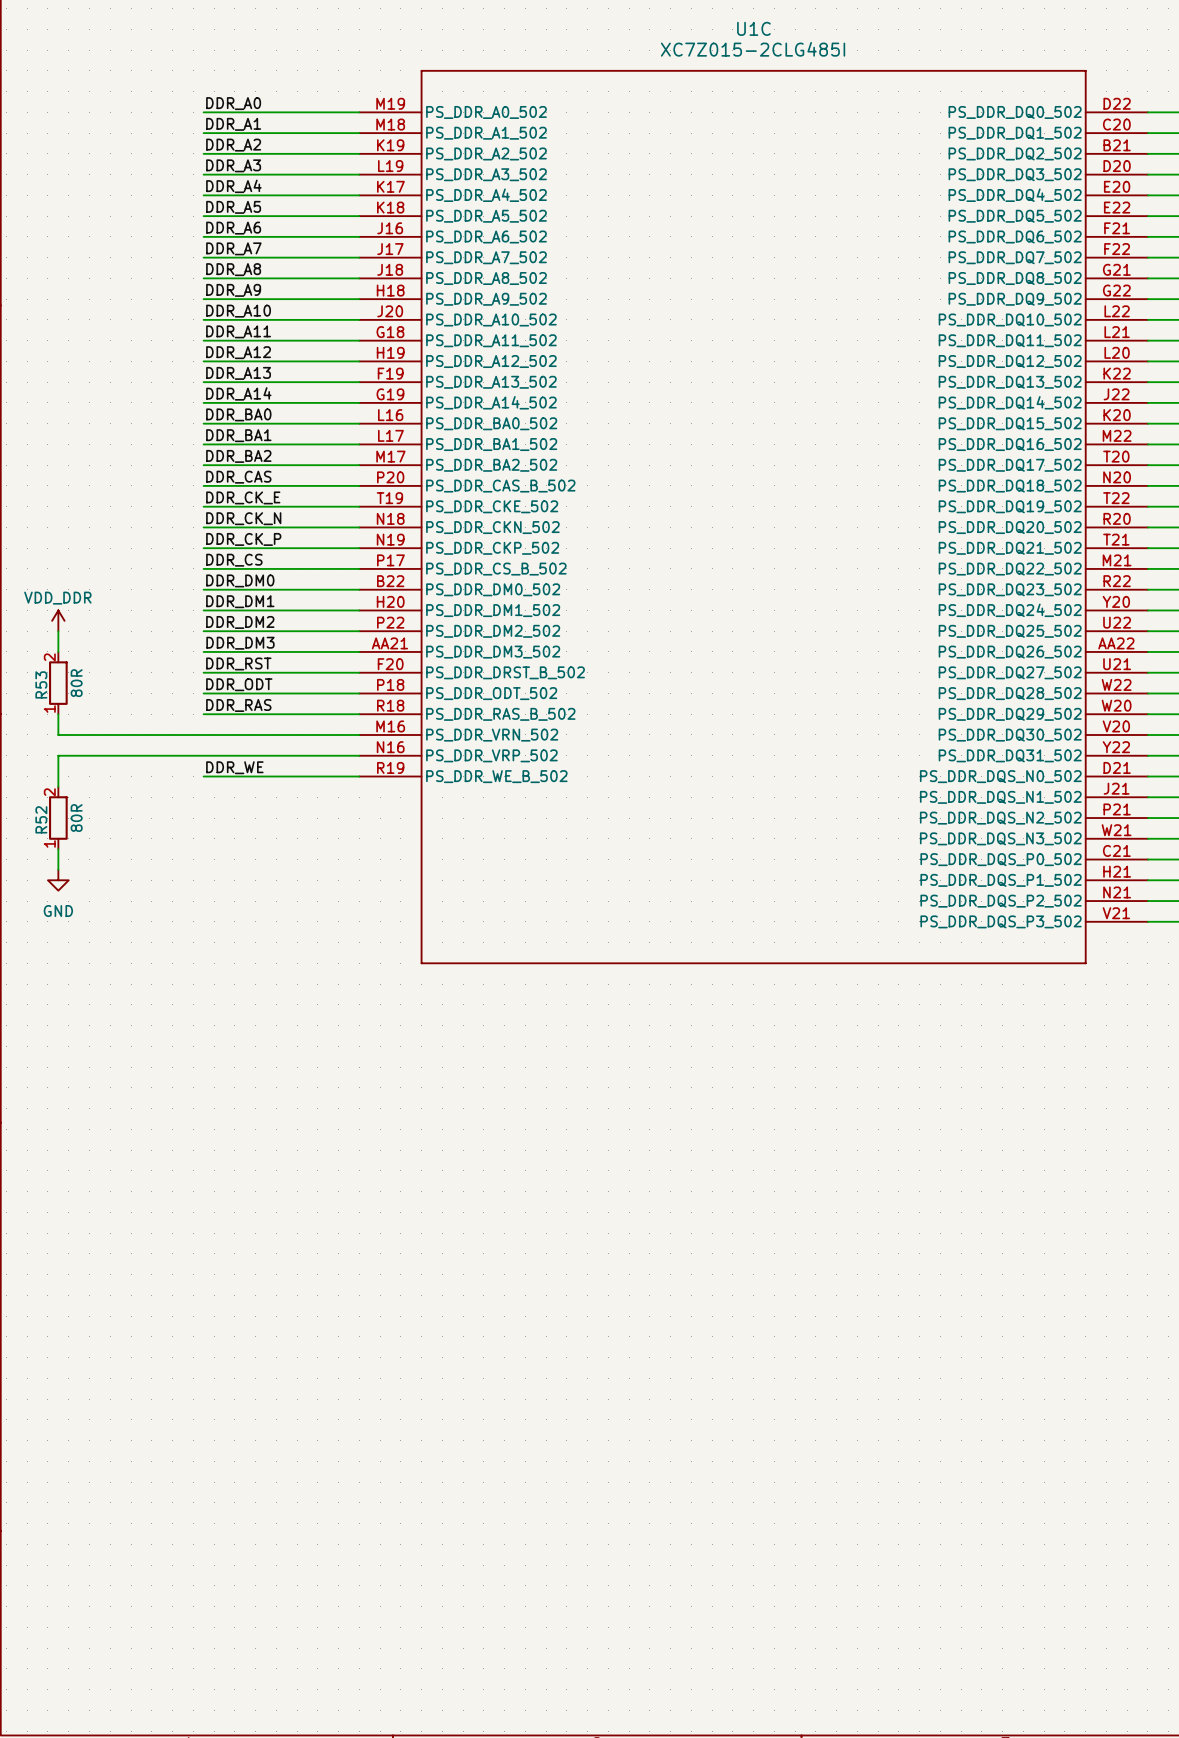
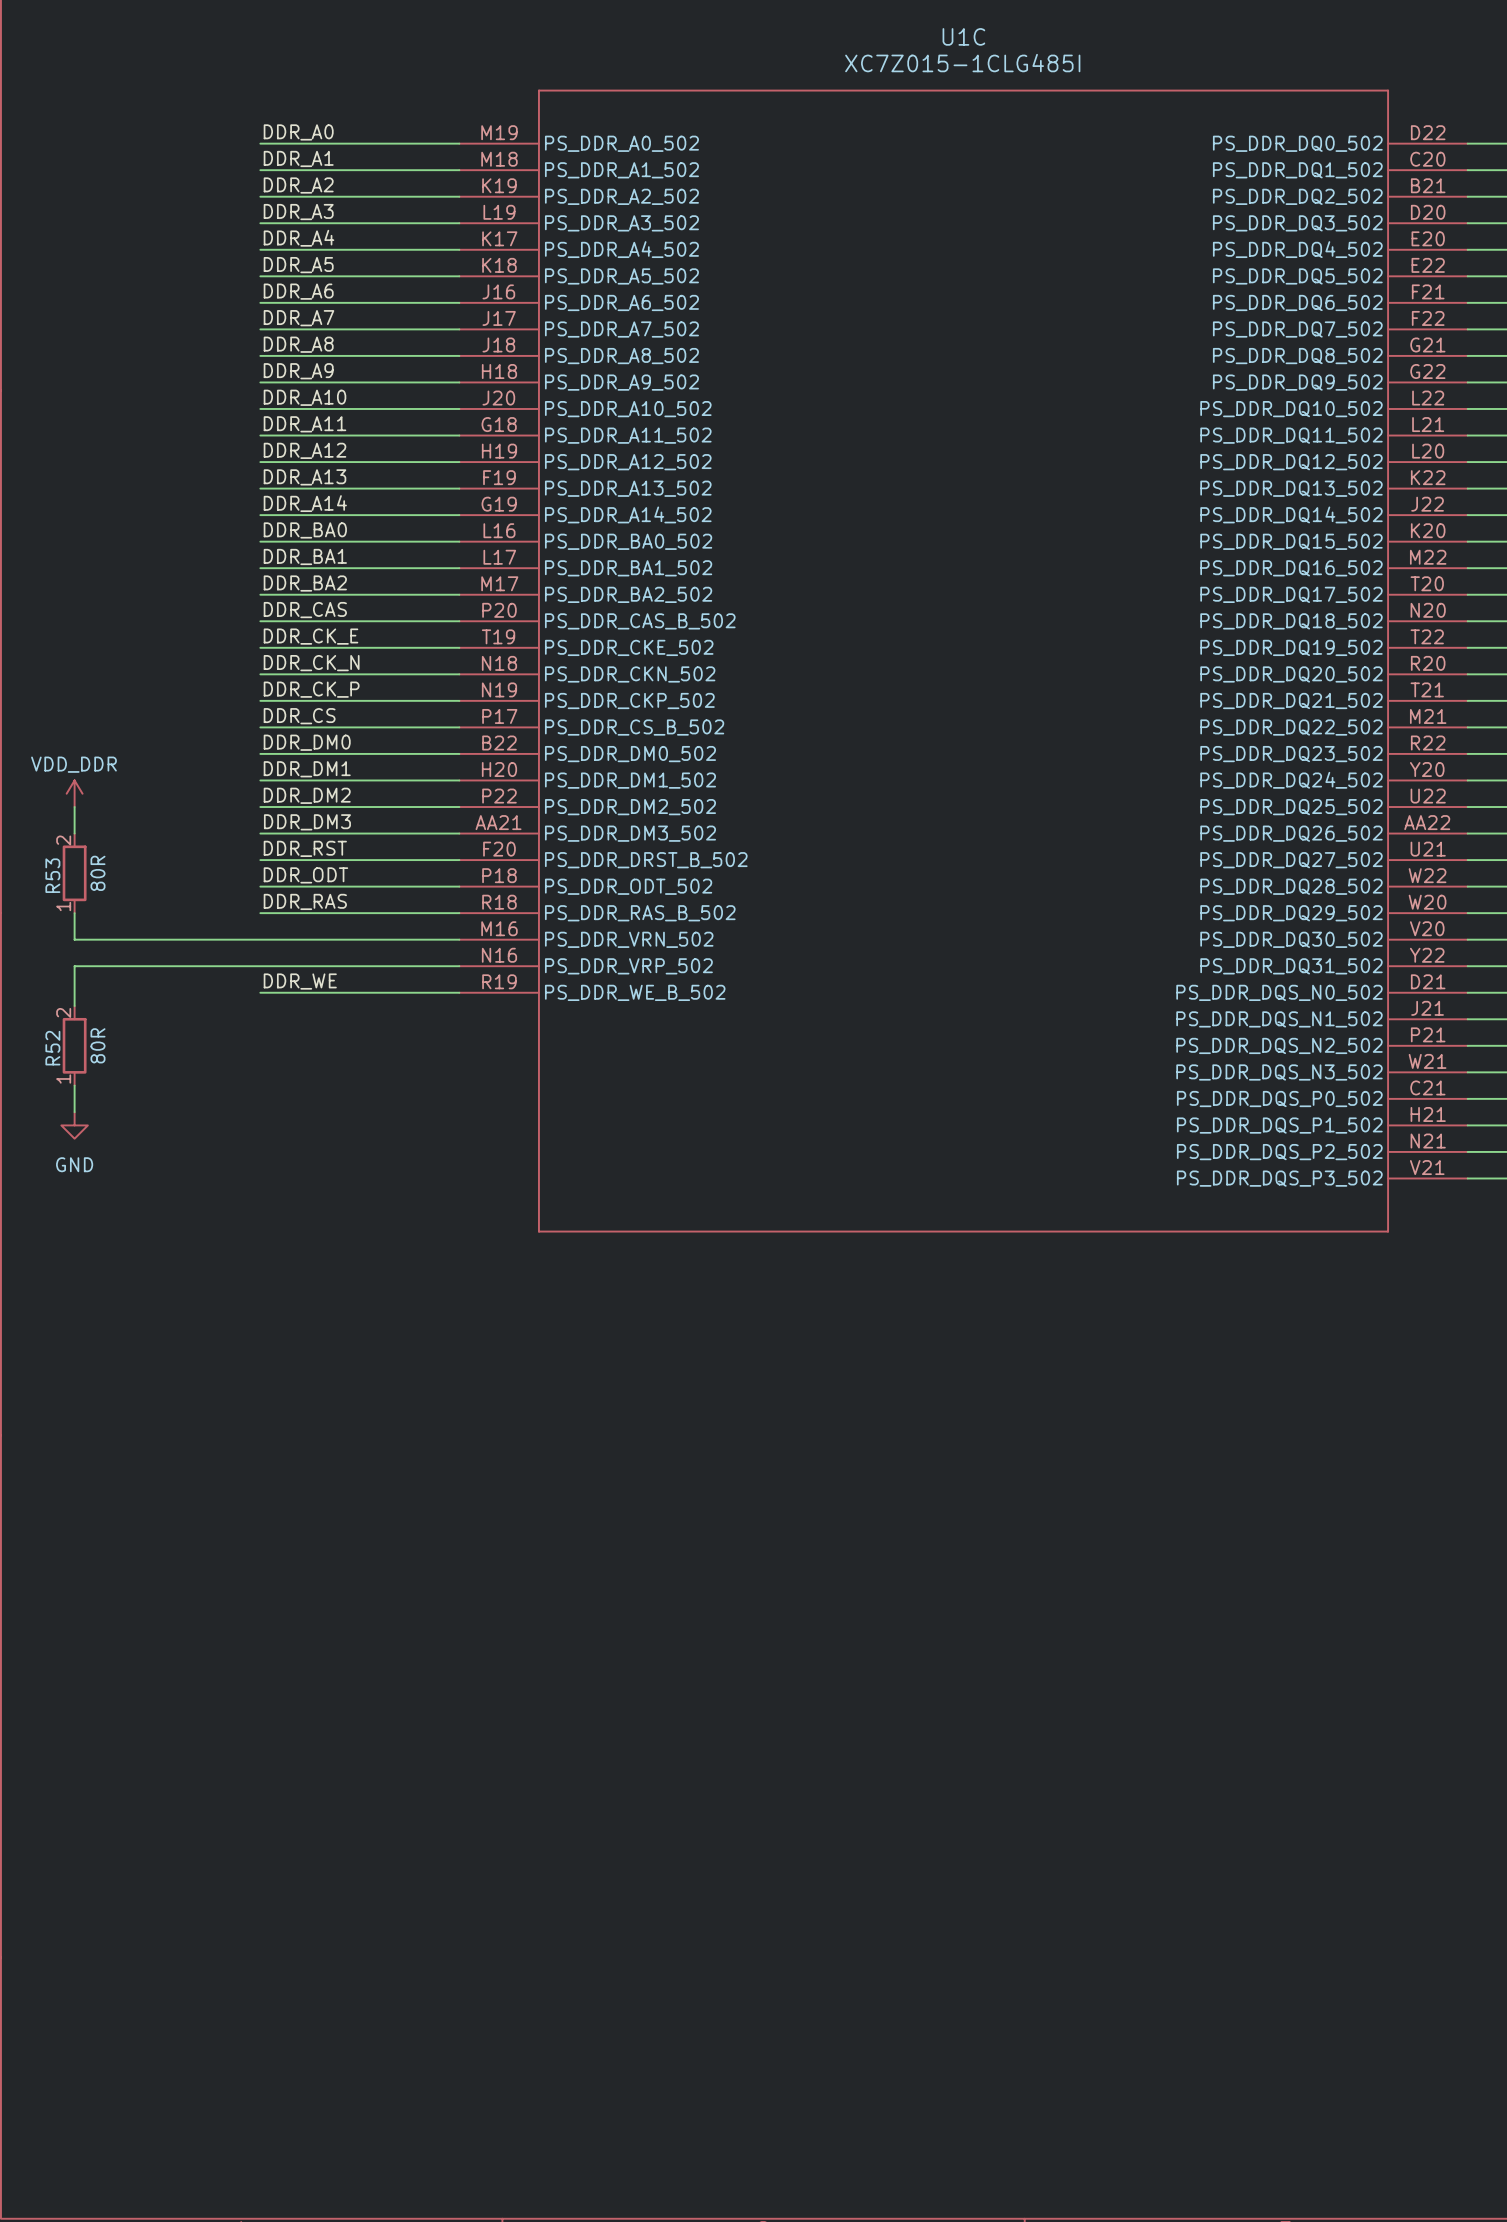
U1C value: XC7Z015-2CLG485I (753, 49) -> XC7Z015-1CLG485I (962, 63)

